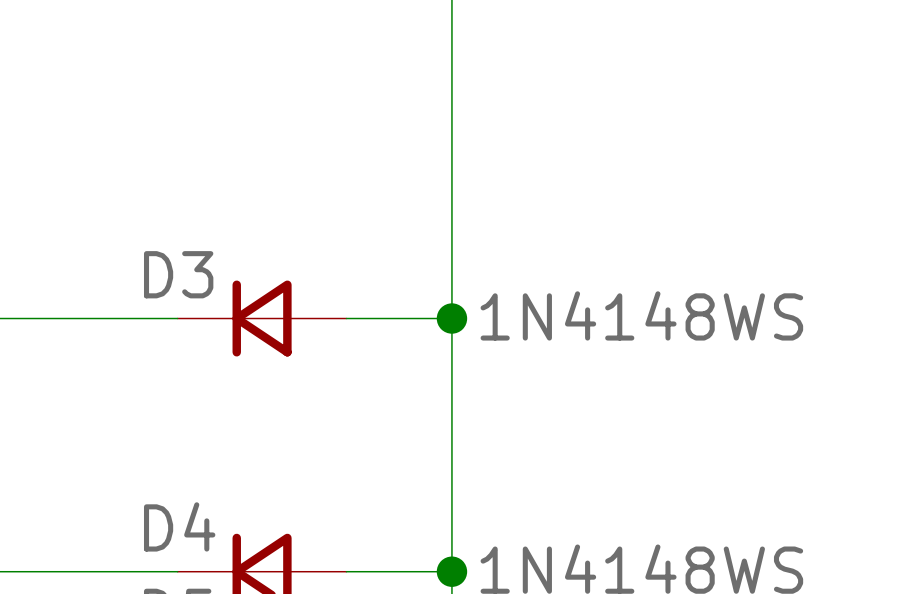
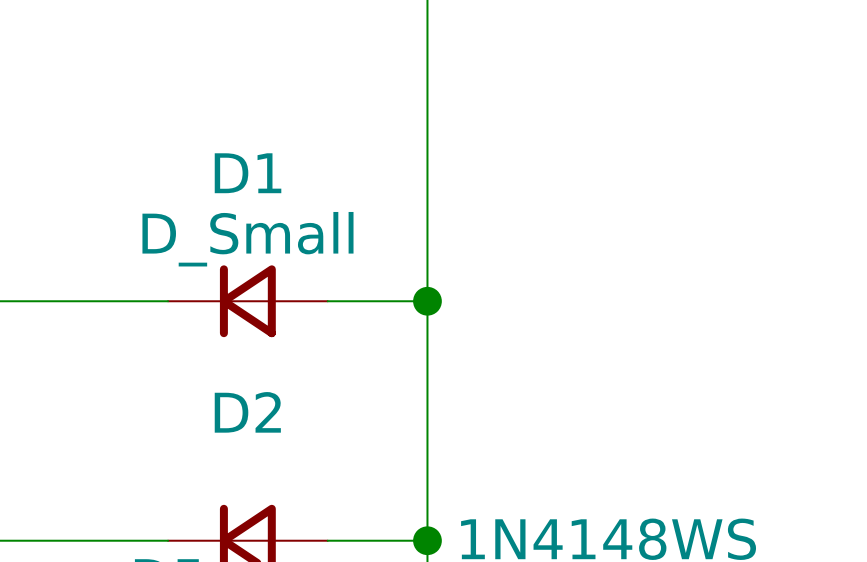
D3 name: D3 (178, 274) -> D1 (248, 173)
D3 value: 1N4148WS (641, 315) -> D_Small (247, 239)
D4 name: D4 (179, 526) -> D2 (247, 412)

